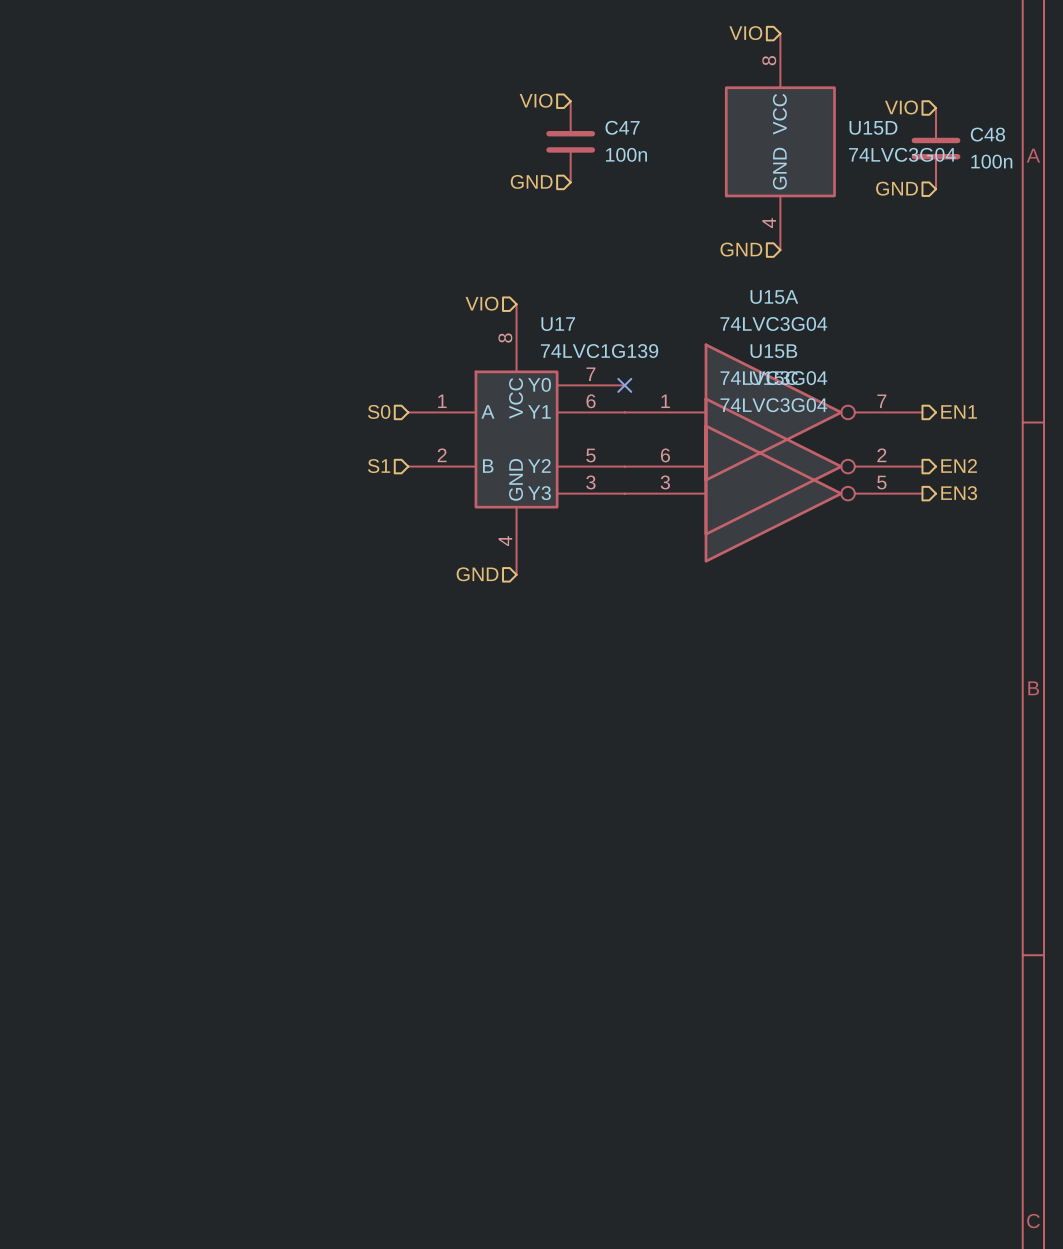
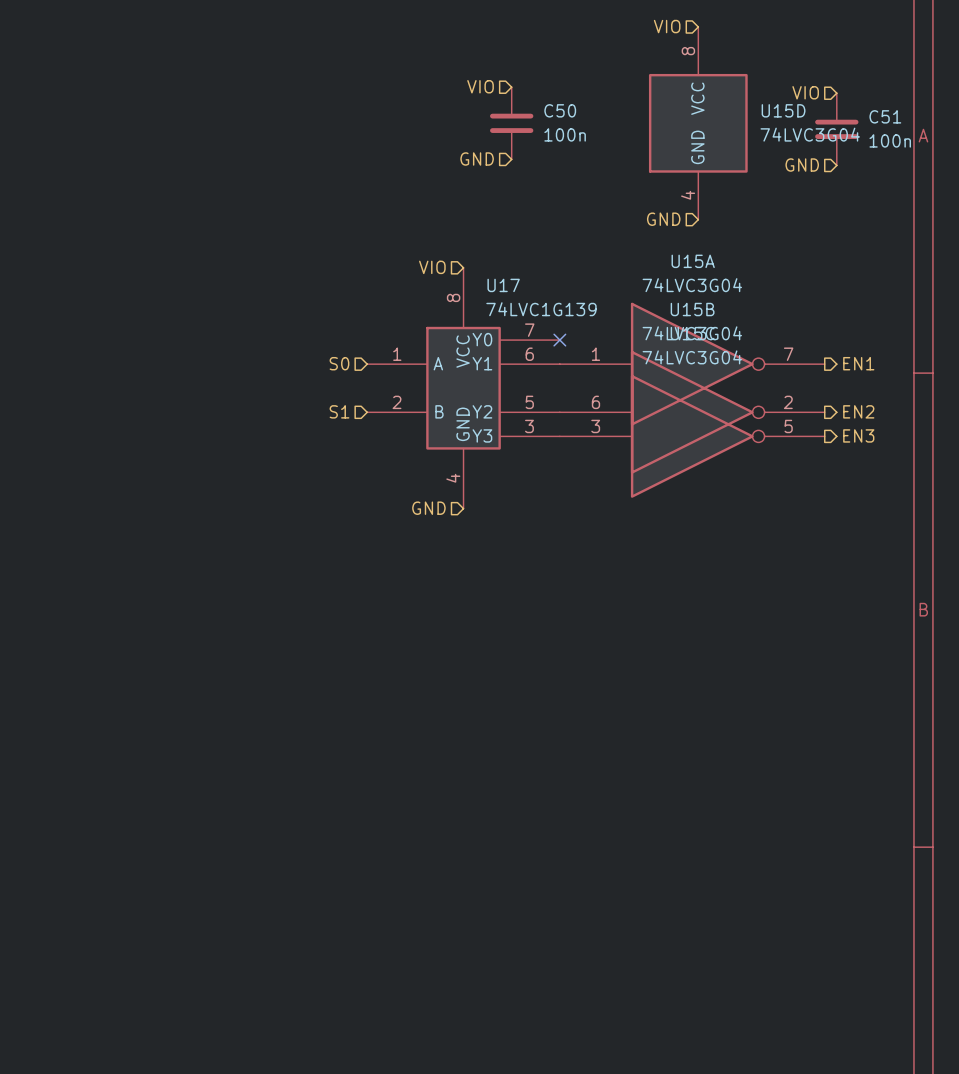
C47 name: C47 (622, 127) -> C50 (560, 110)
C48 name: C48 (987, 134) -> C51 (885, 116)

